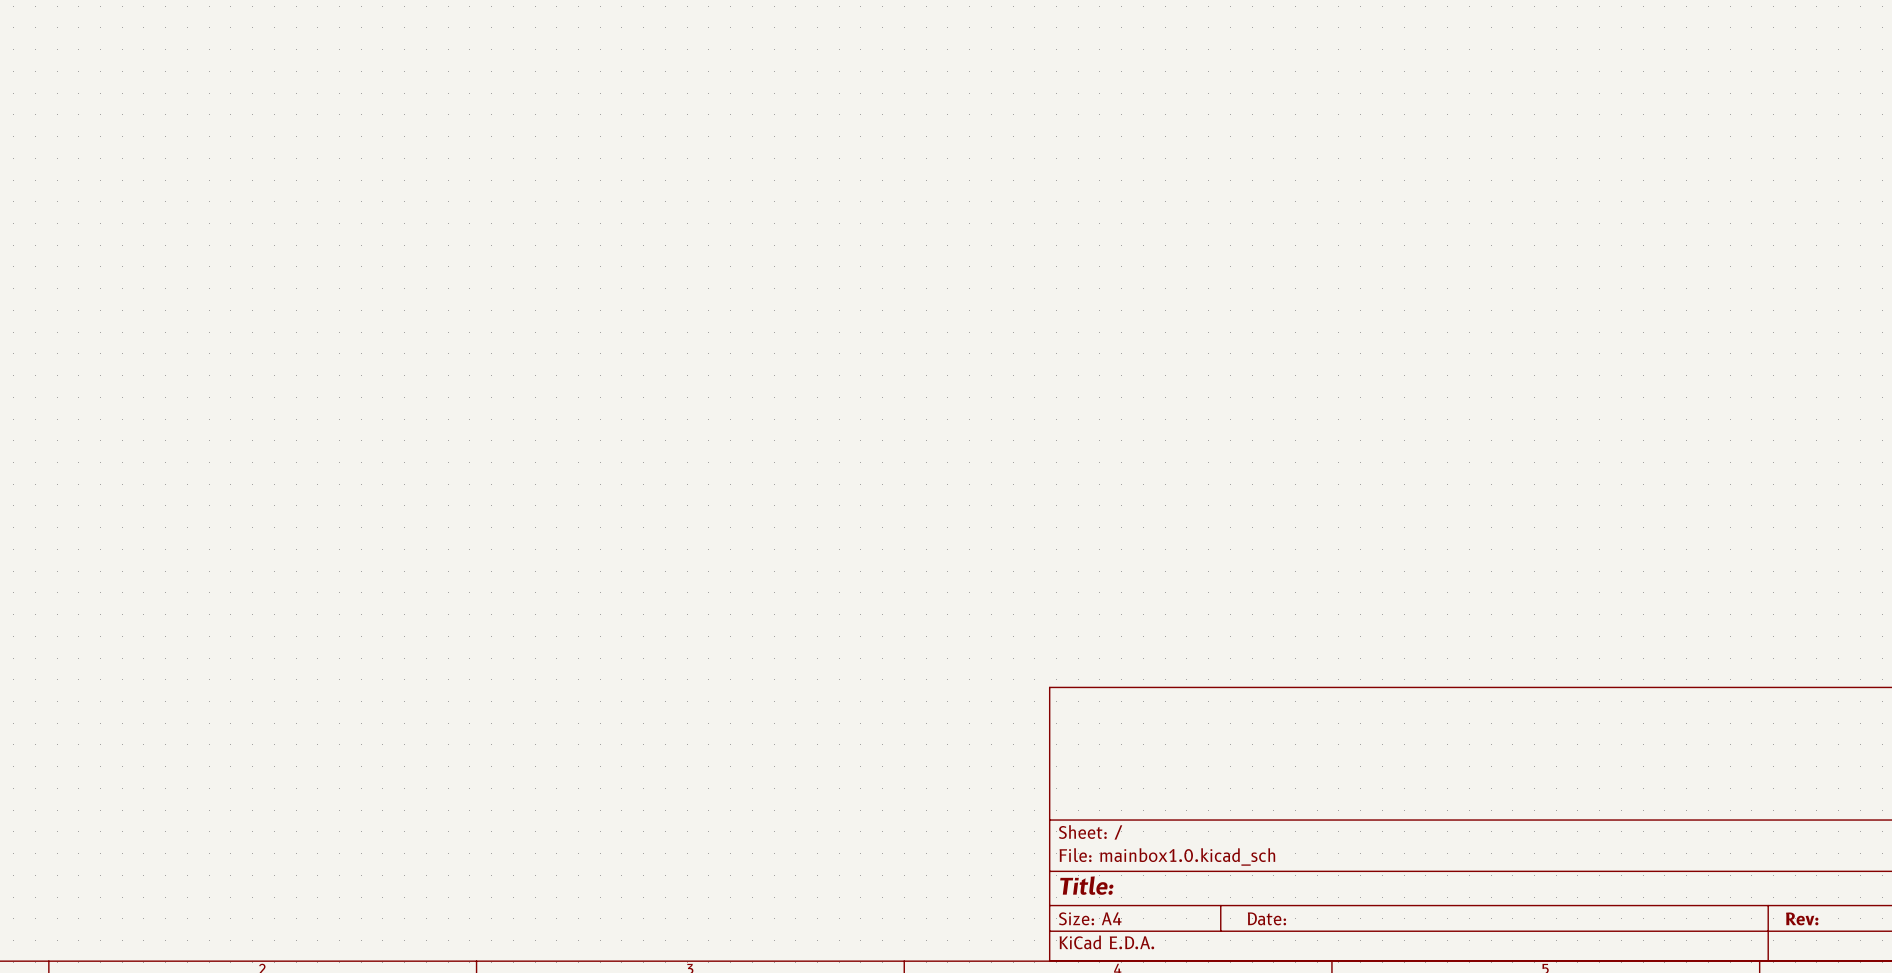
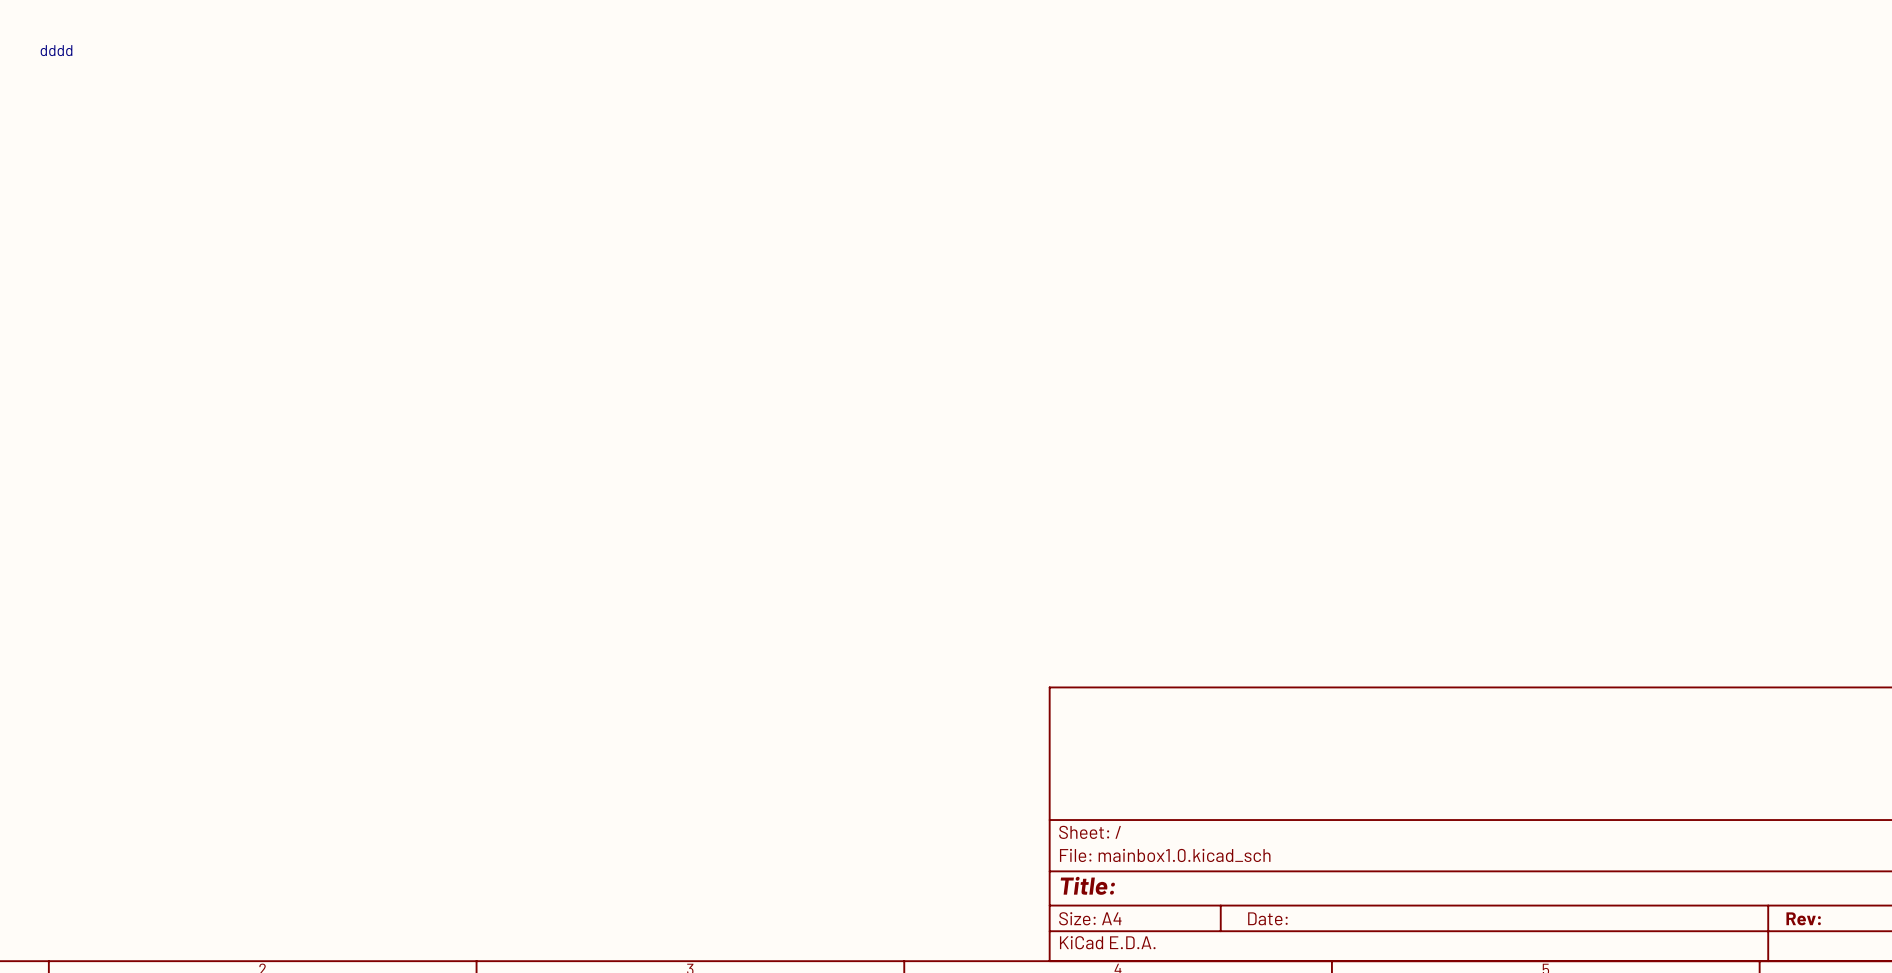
text: none -> dddd (56, 50)

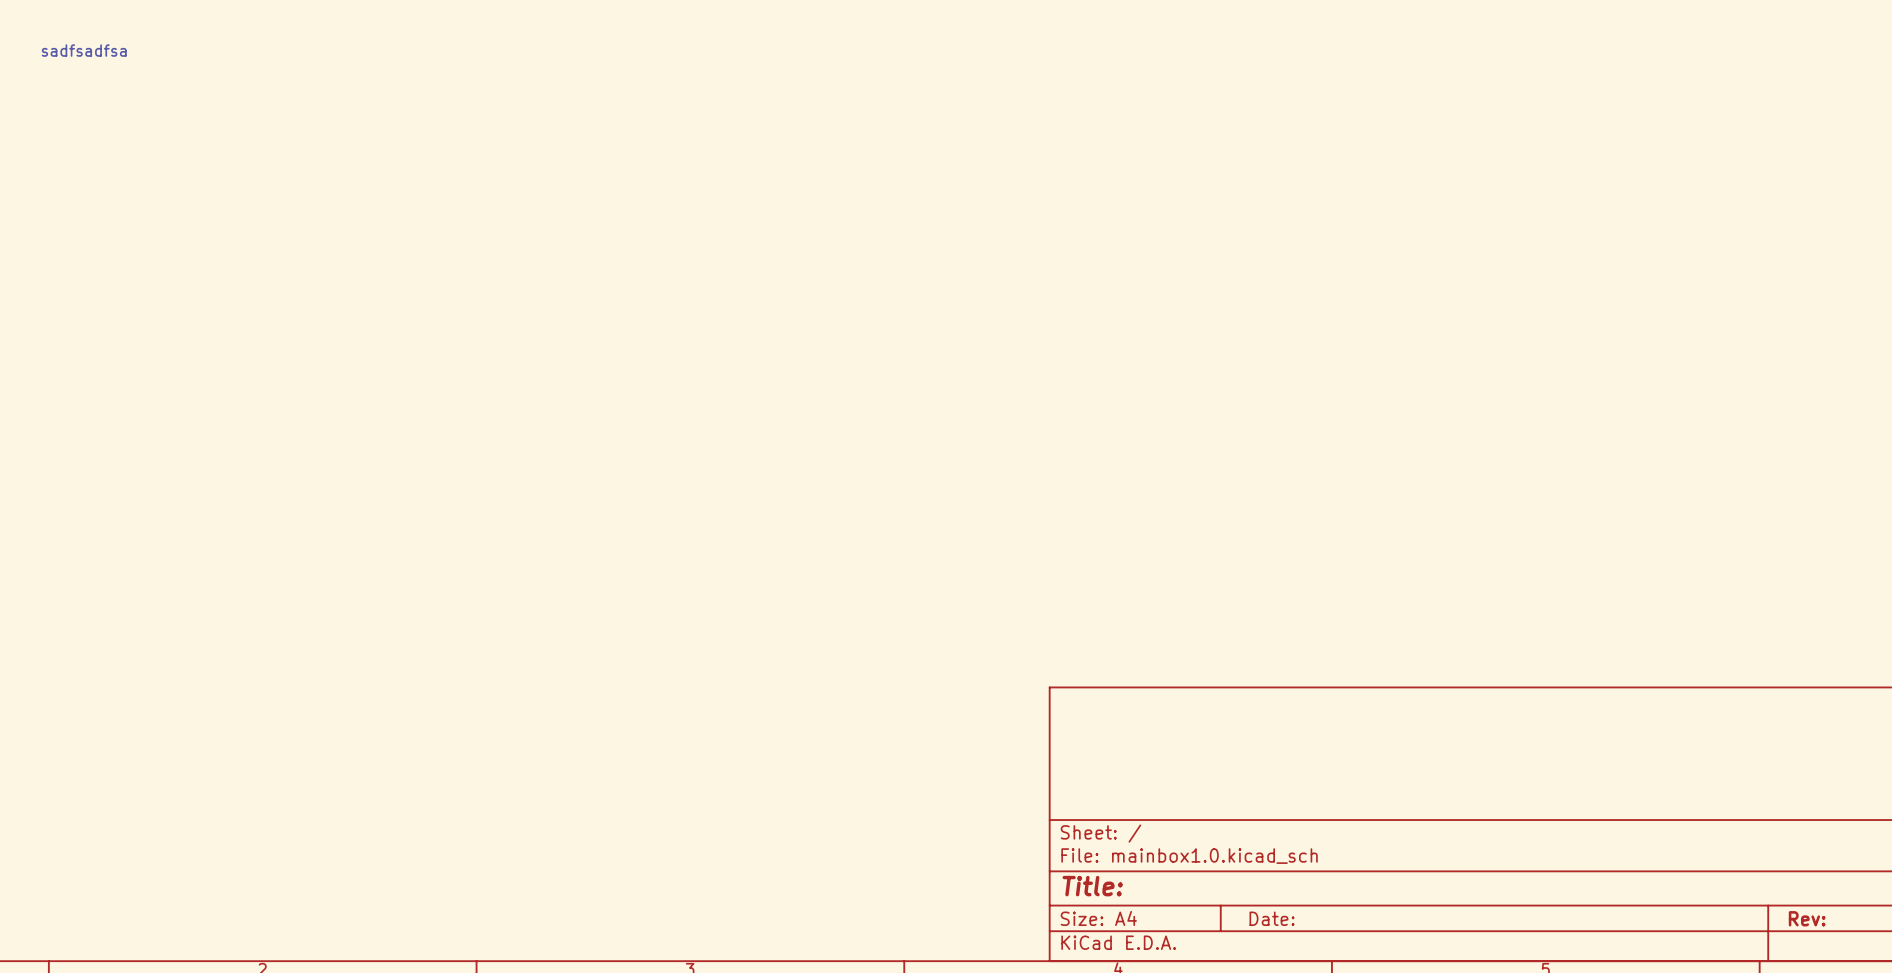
text: dddd (56, 50) -> sadfsadfsa (84, 50)

